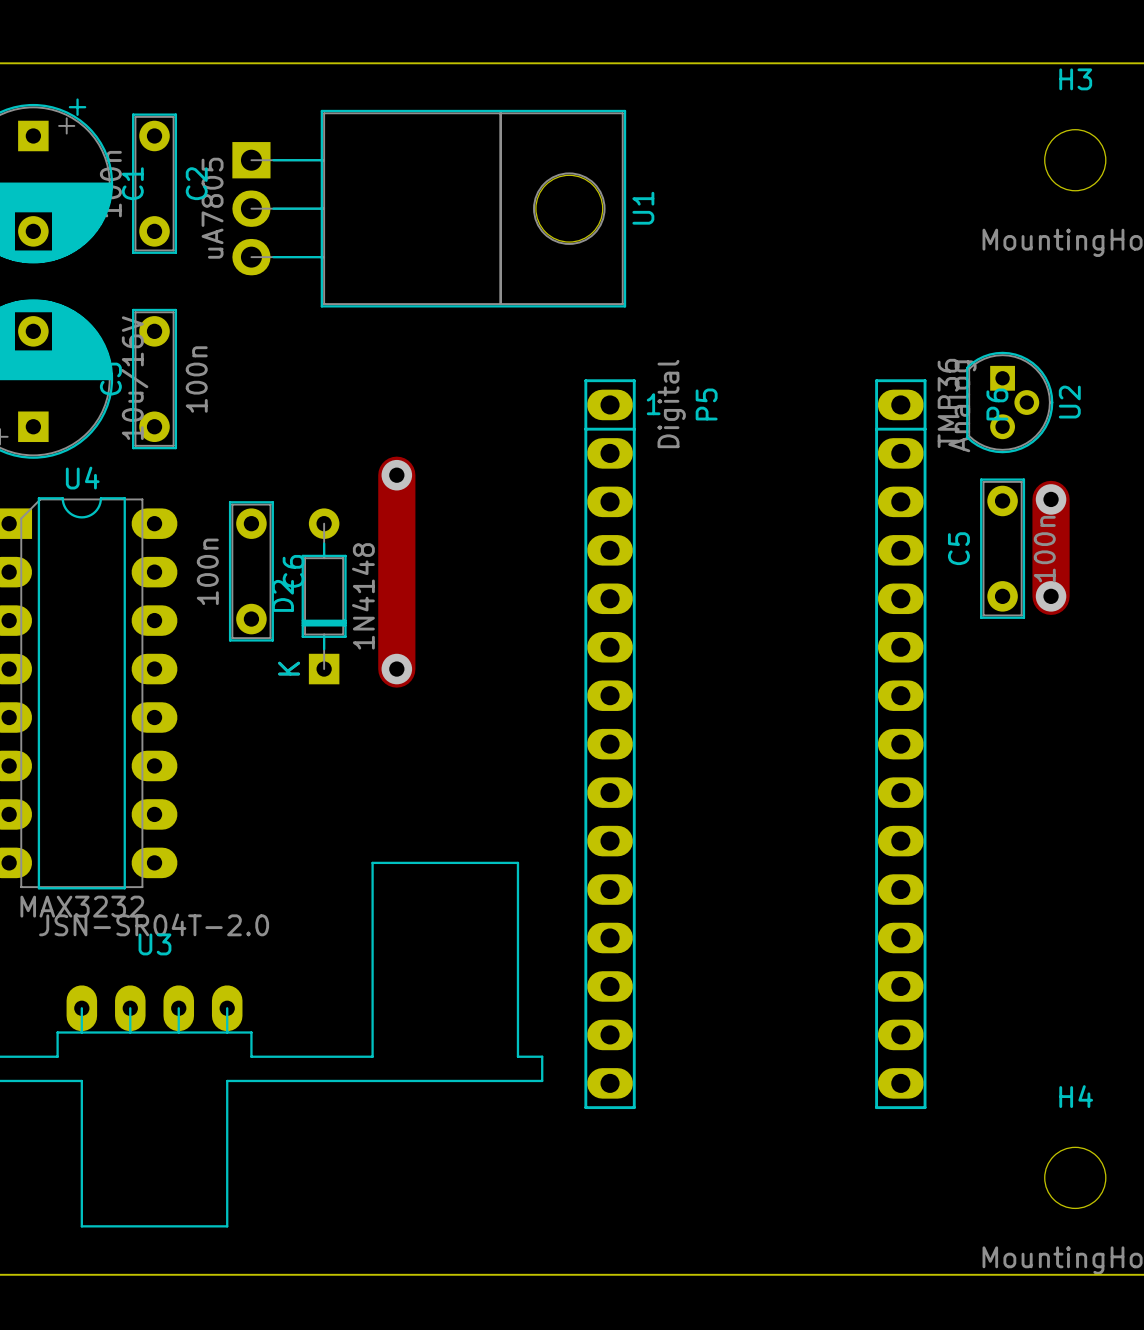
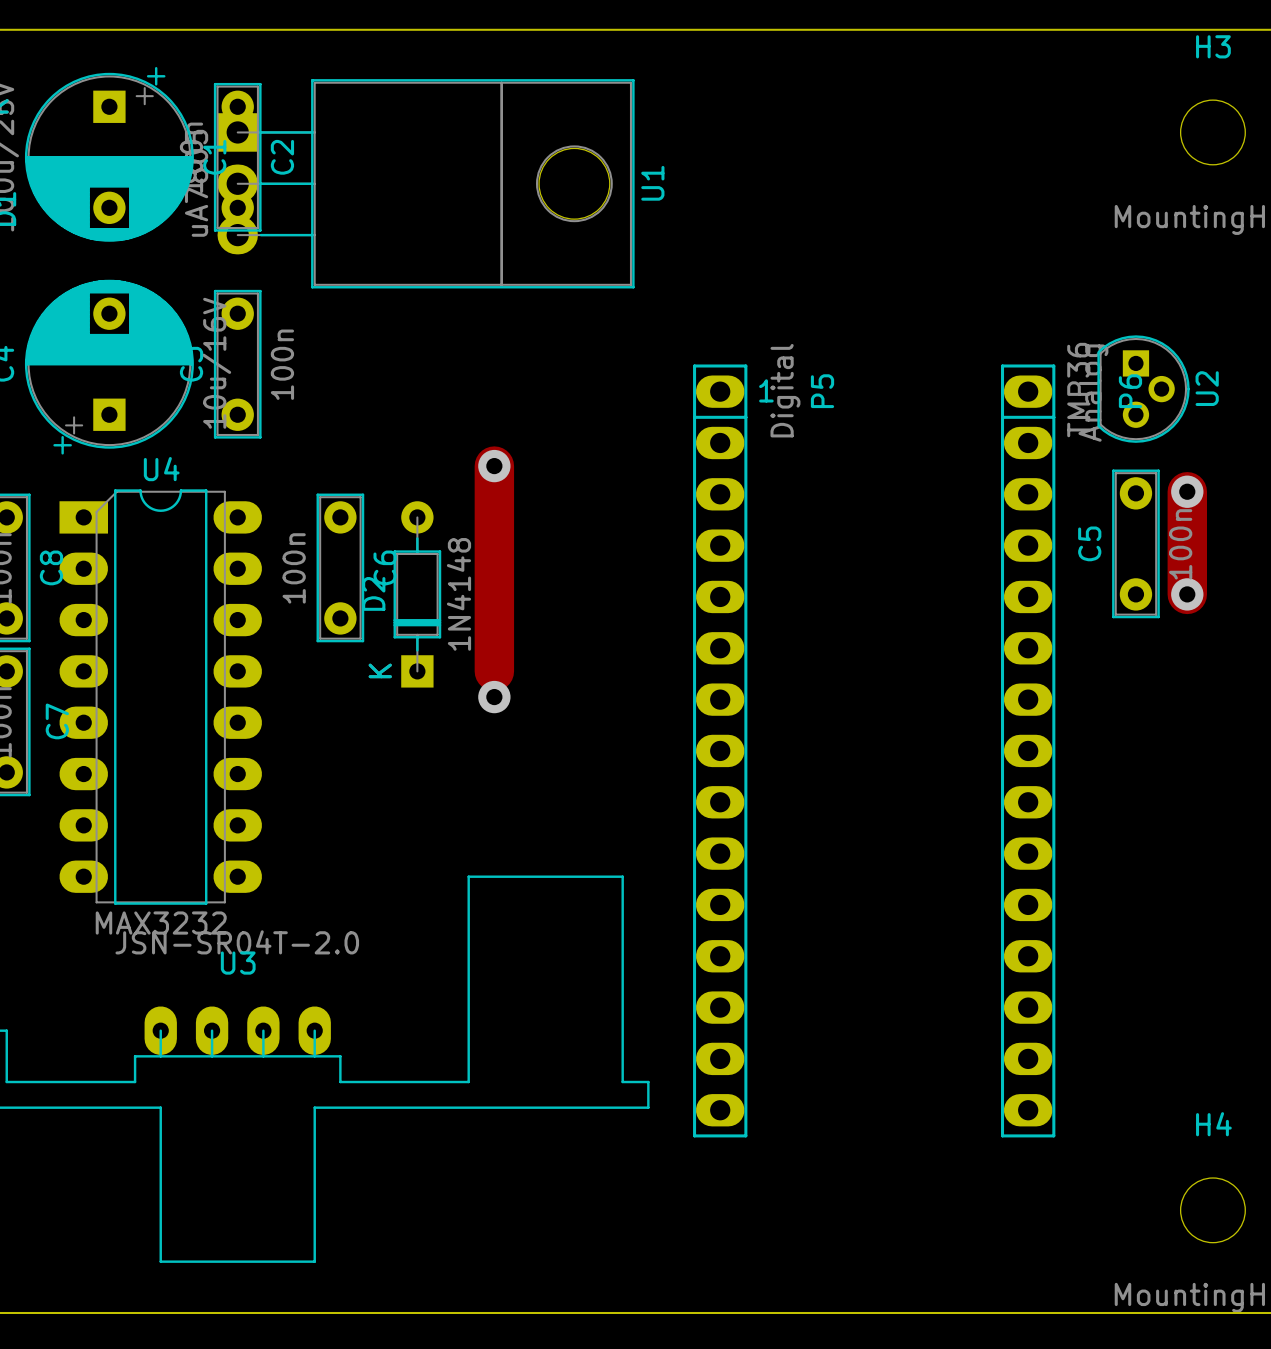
U1 position: (429, 208) -> (426, 183)
via position: (396, 669) -> (494, 697)

